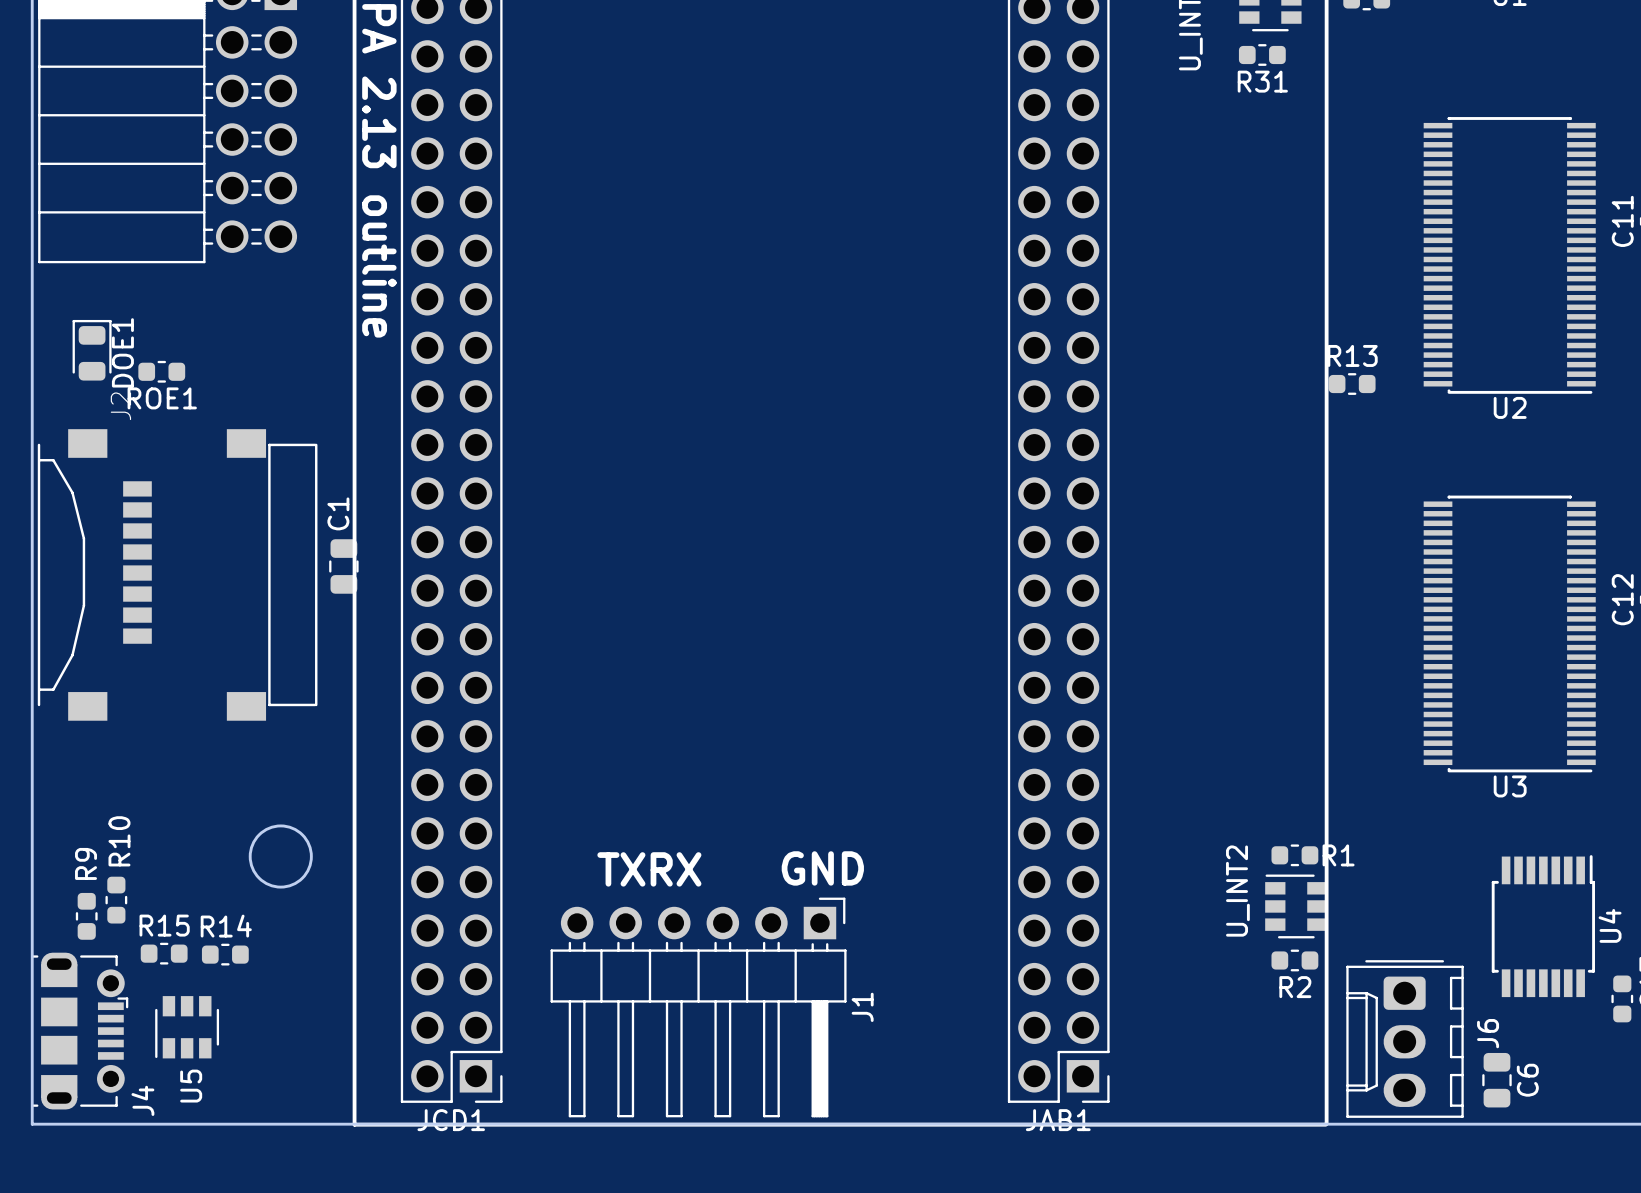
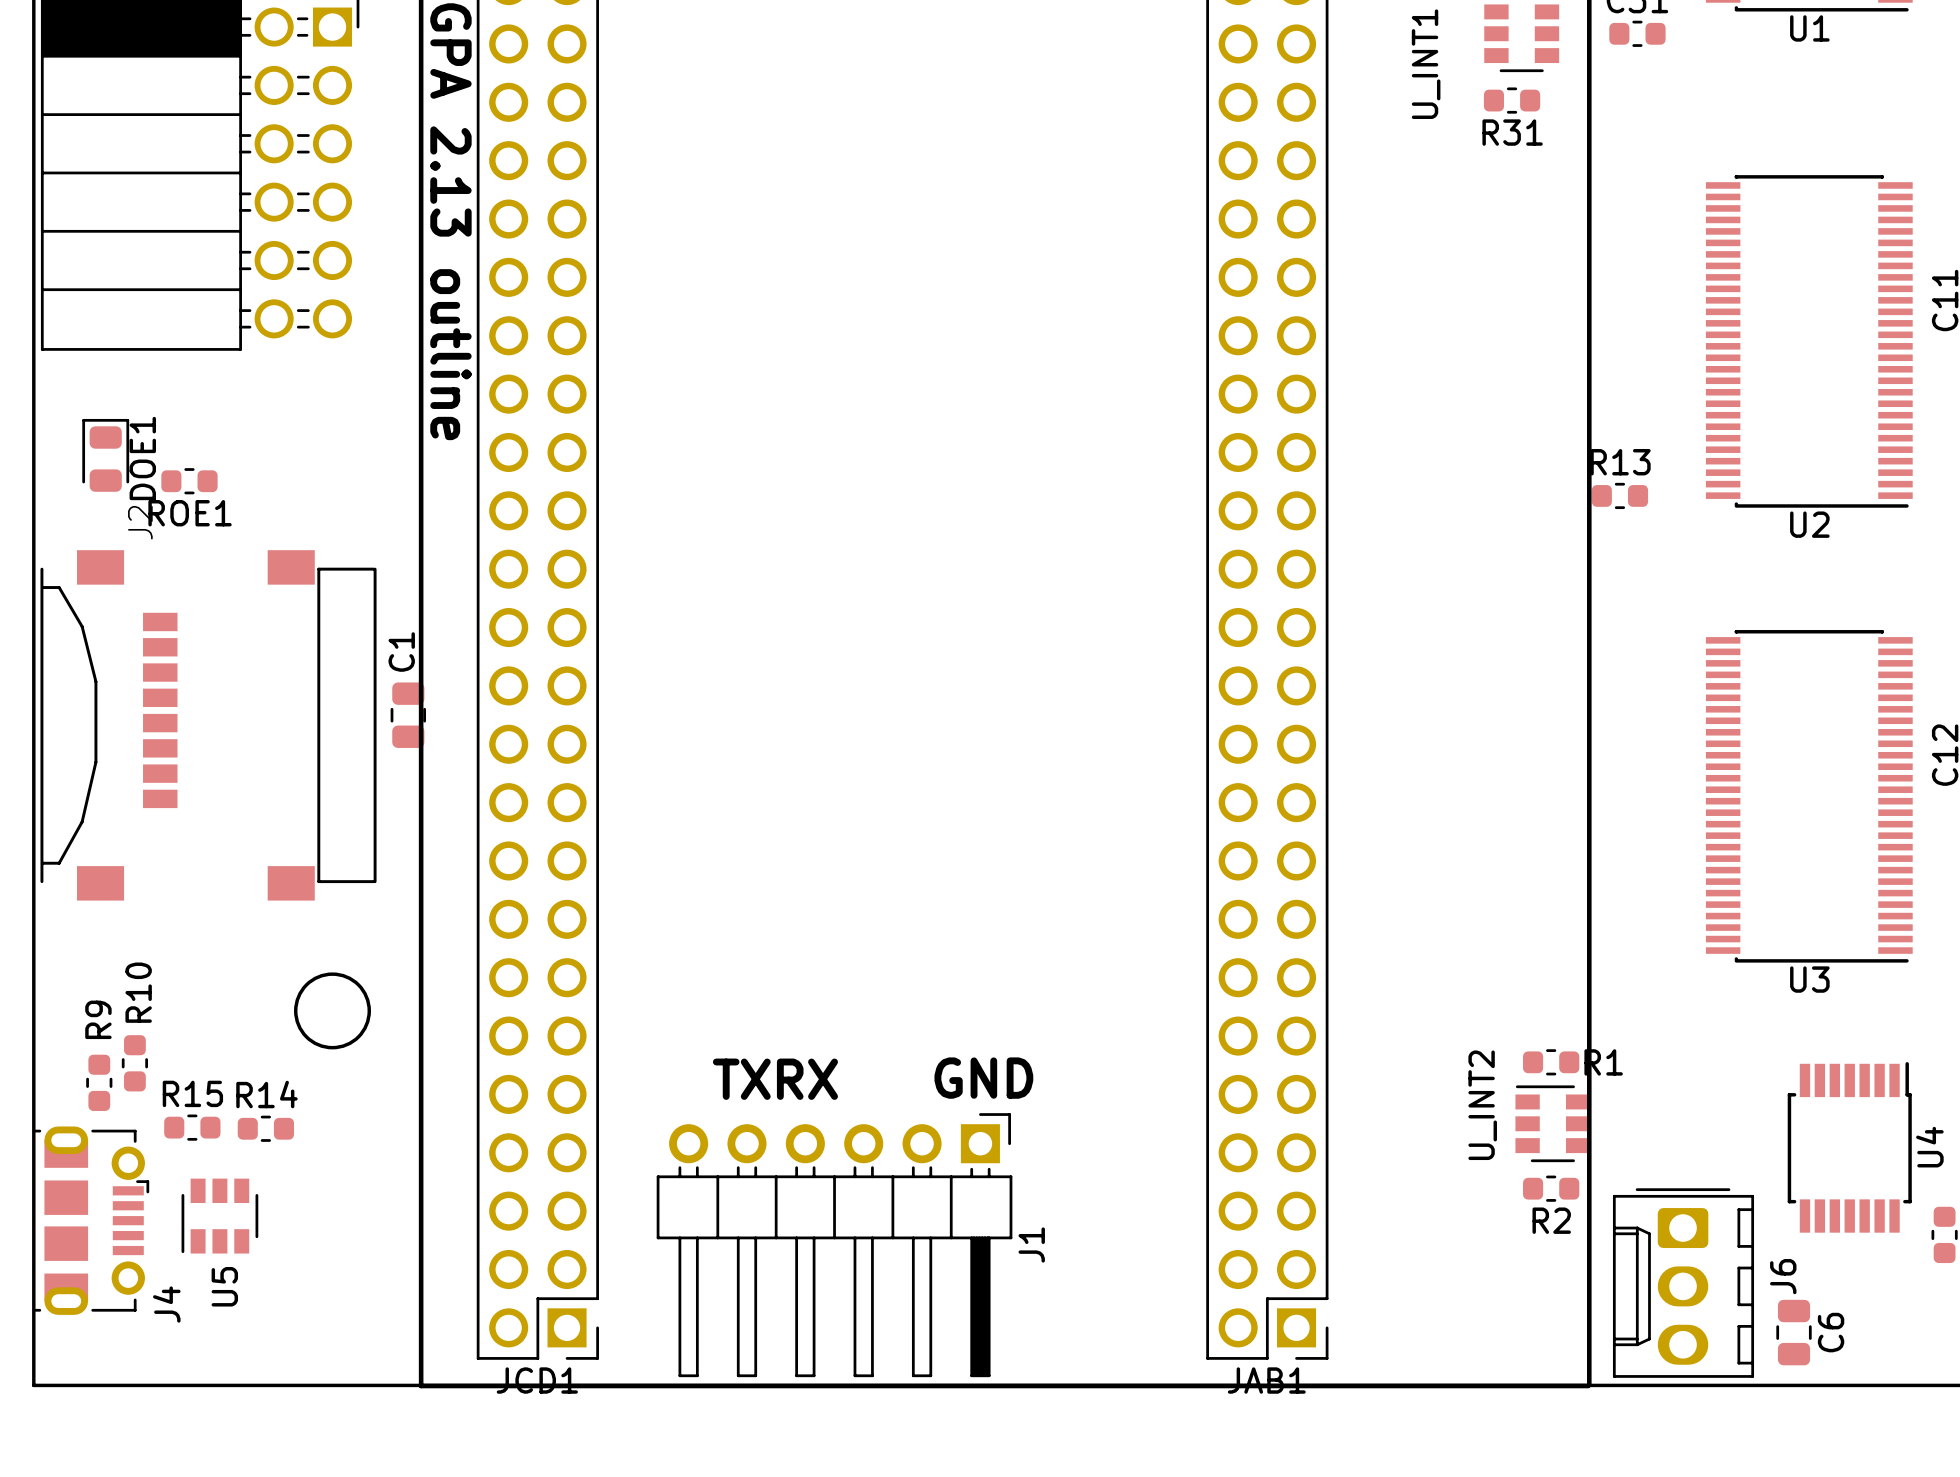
round board edge position: (280, 856) -> (332, 1010)
R10 position: (116, 900) -> (134, 1063)
R9 position: (86, 916) -> (99, 1082)
R15 position: (164, 953) -> (192, 1127)
R14 position: (225, 954) -> (265, 1128)
U5 position: (187, 1027) -> (219, 1216)
J4 position: (79, 1031) -> (90, 1220)

